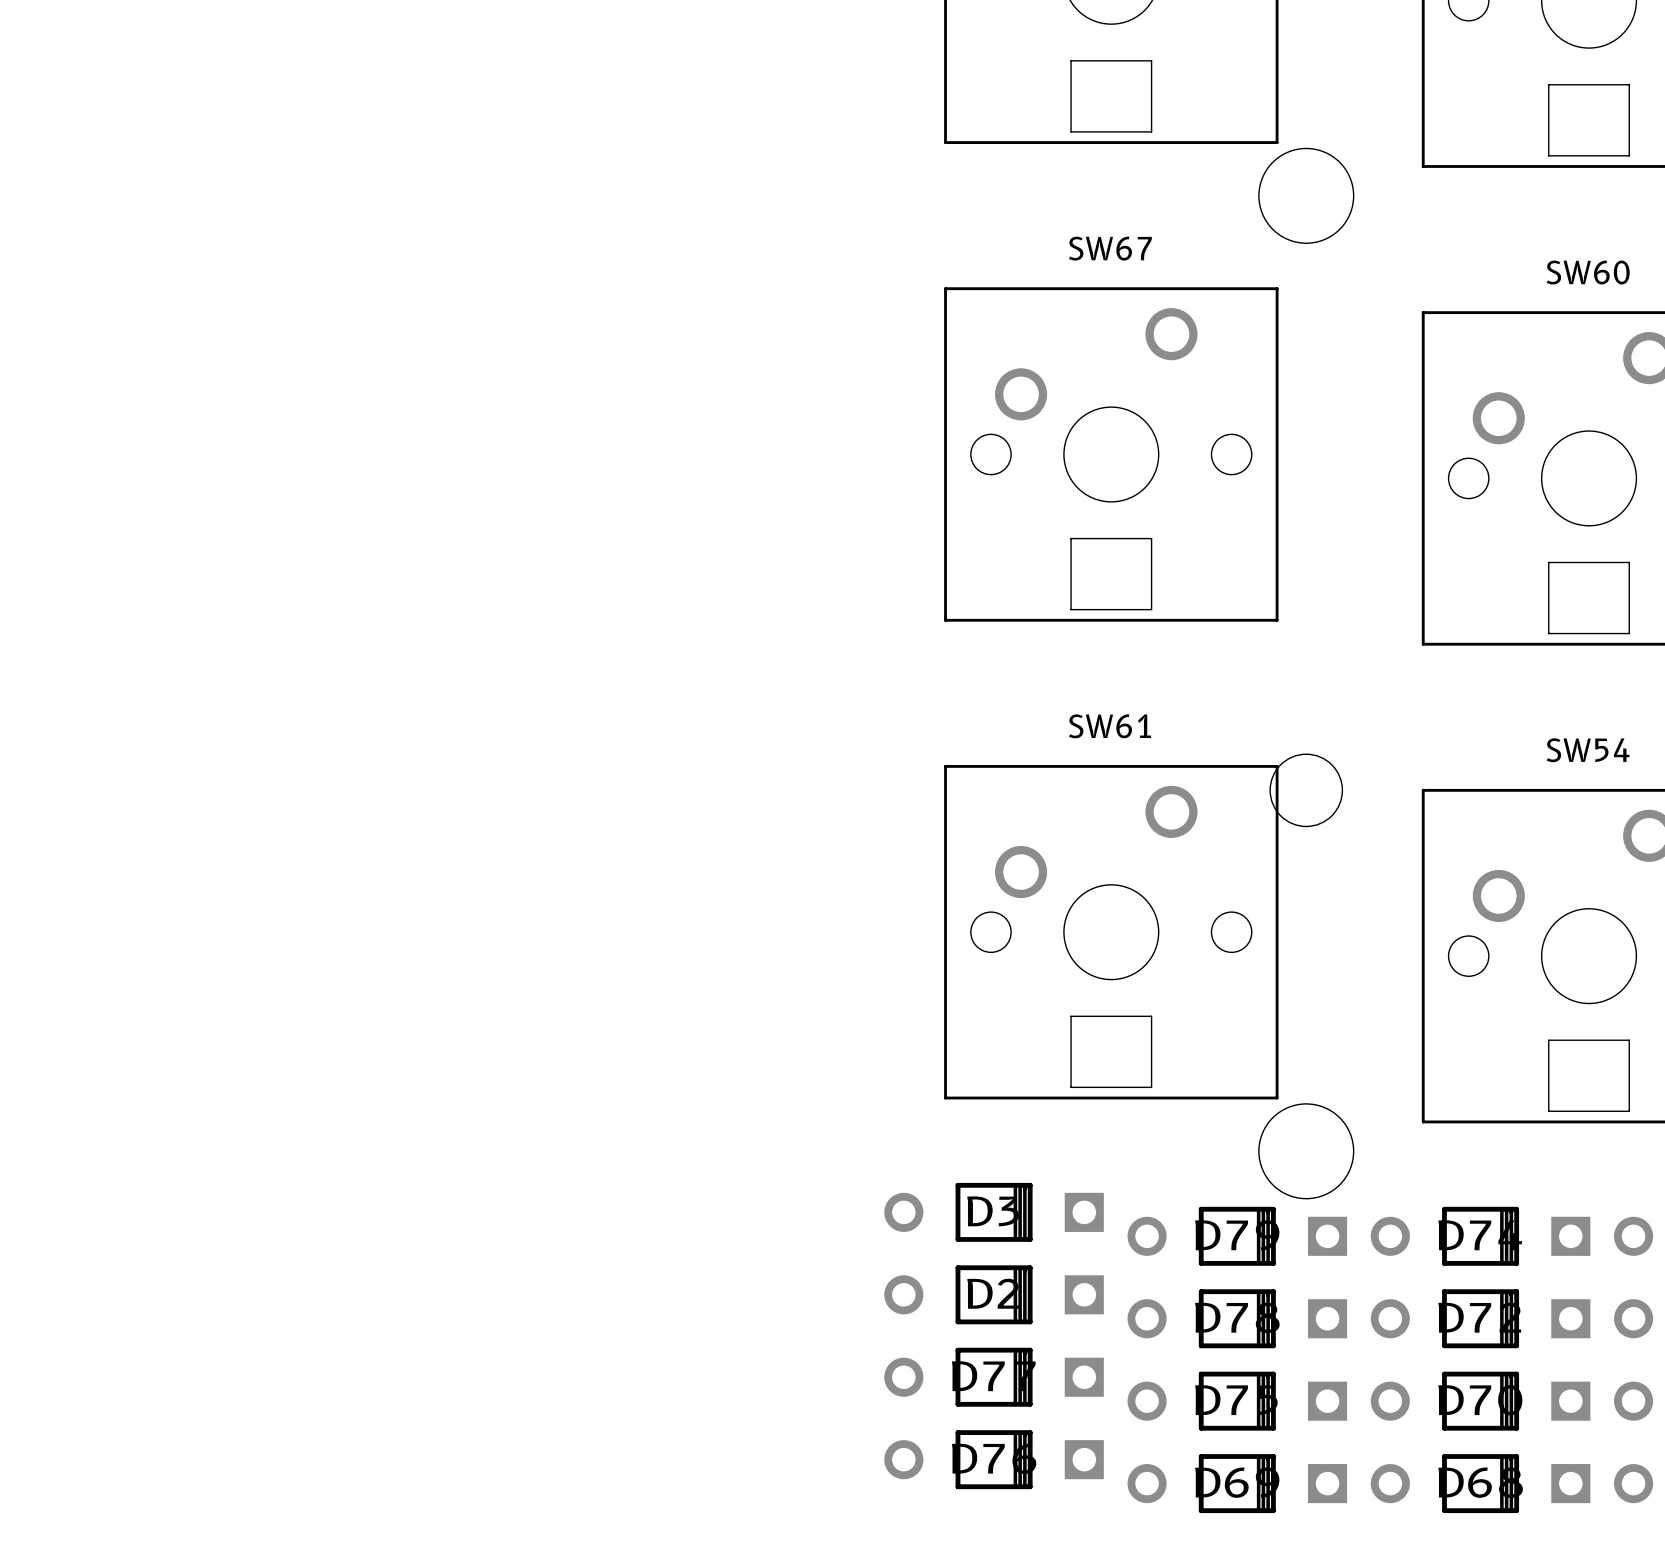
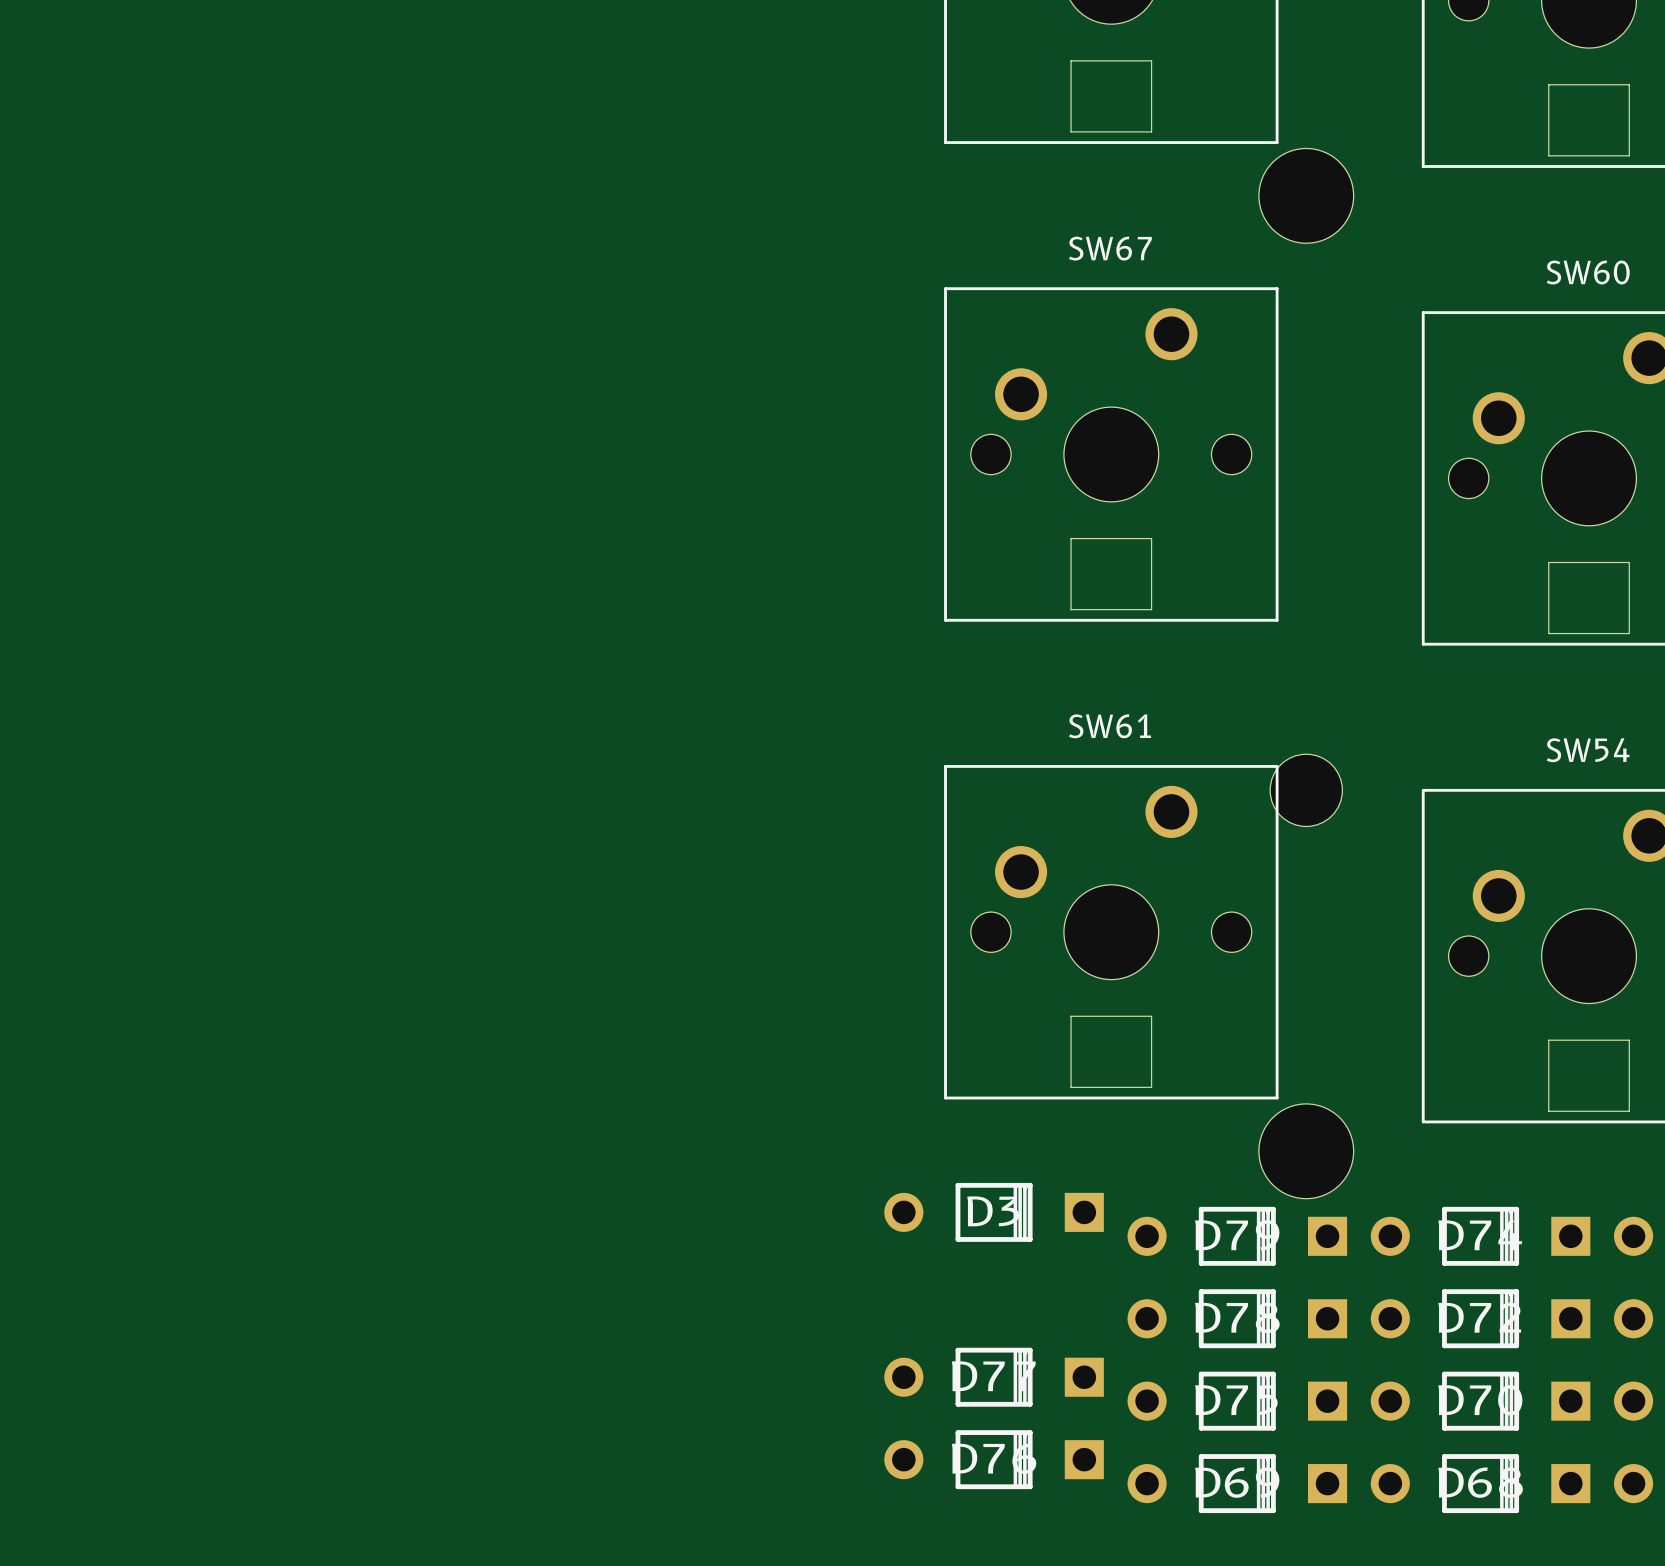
D2: (994, 1294) -> none

